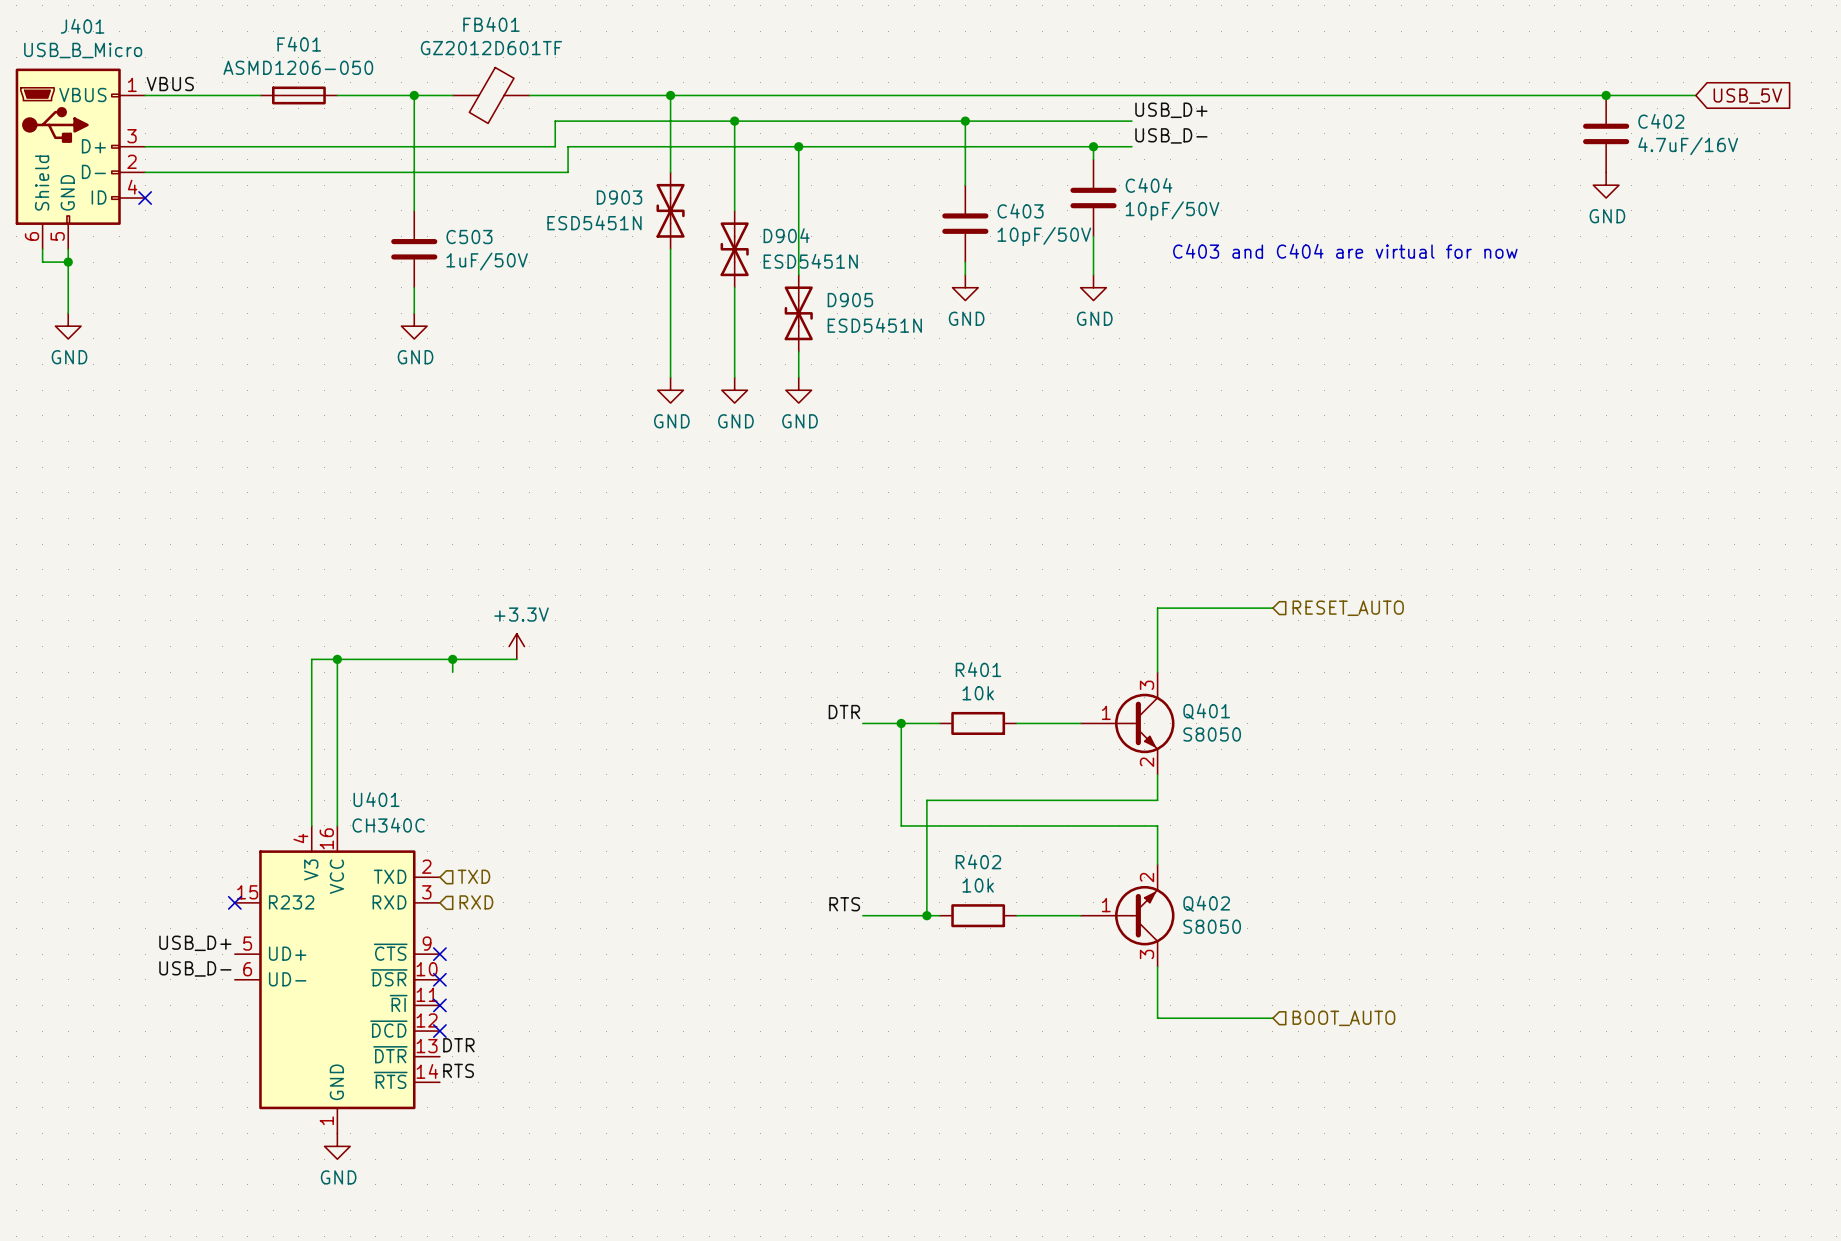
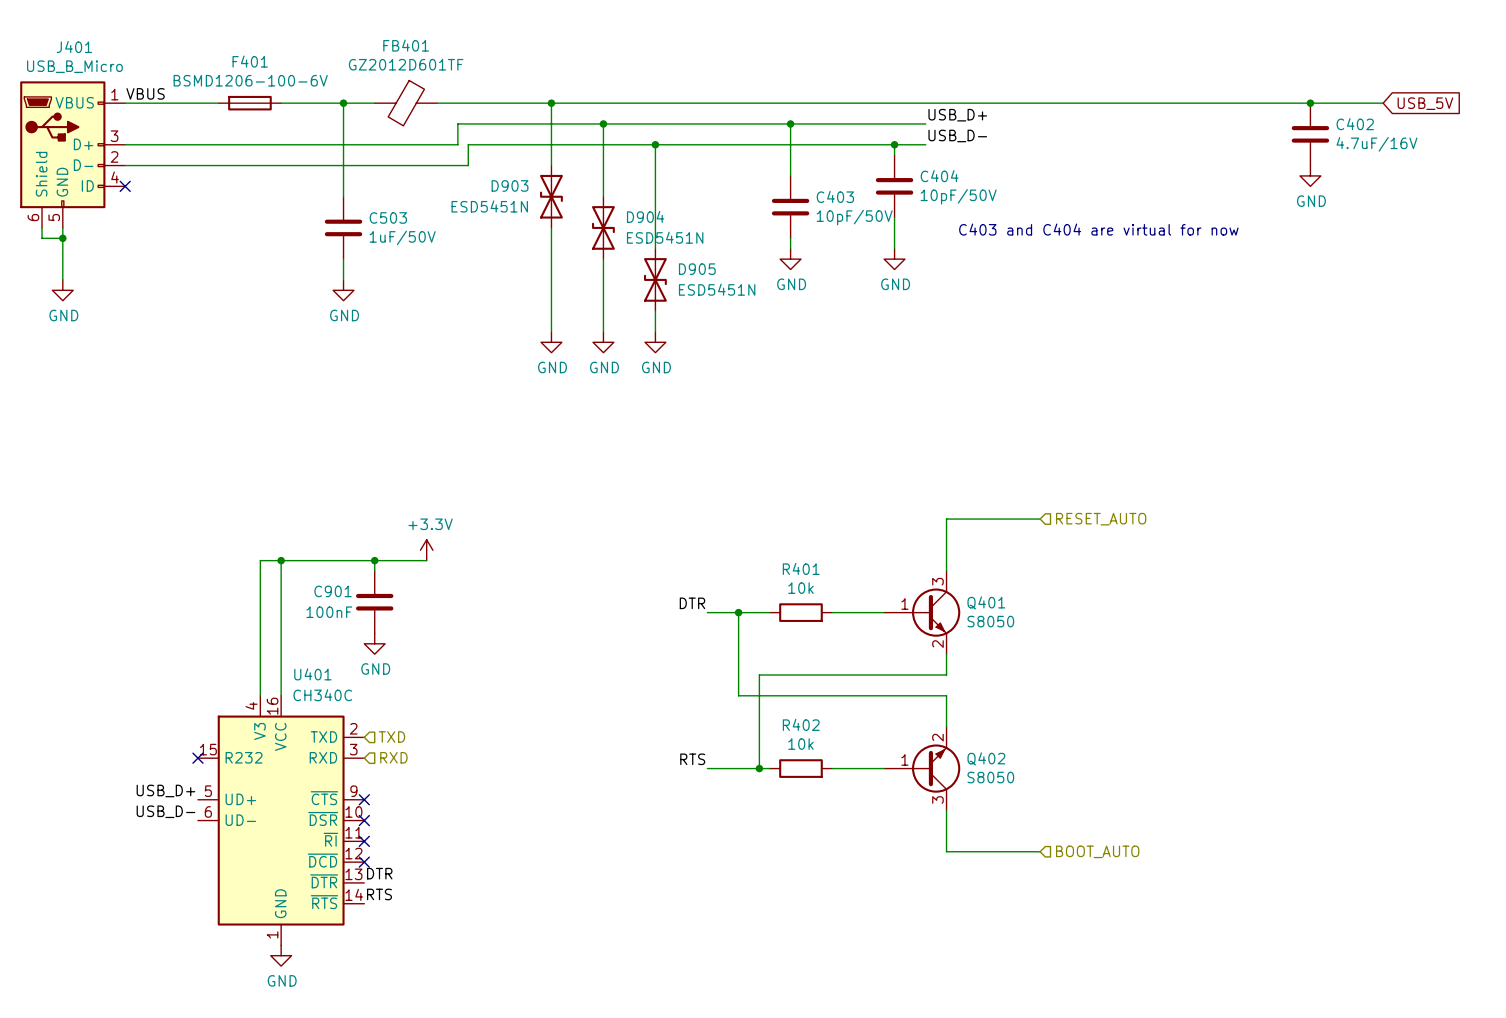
F401 value: ASMD1206-050 (298, 67) -> BSMD1206-100-6V (250, 80)
C901: none -> 100nF (374, 602)
power symbol: none -> GND (374, 643)

